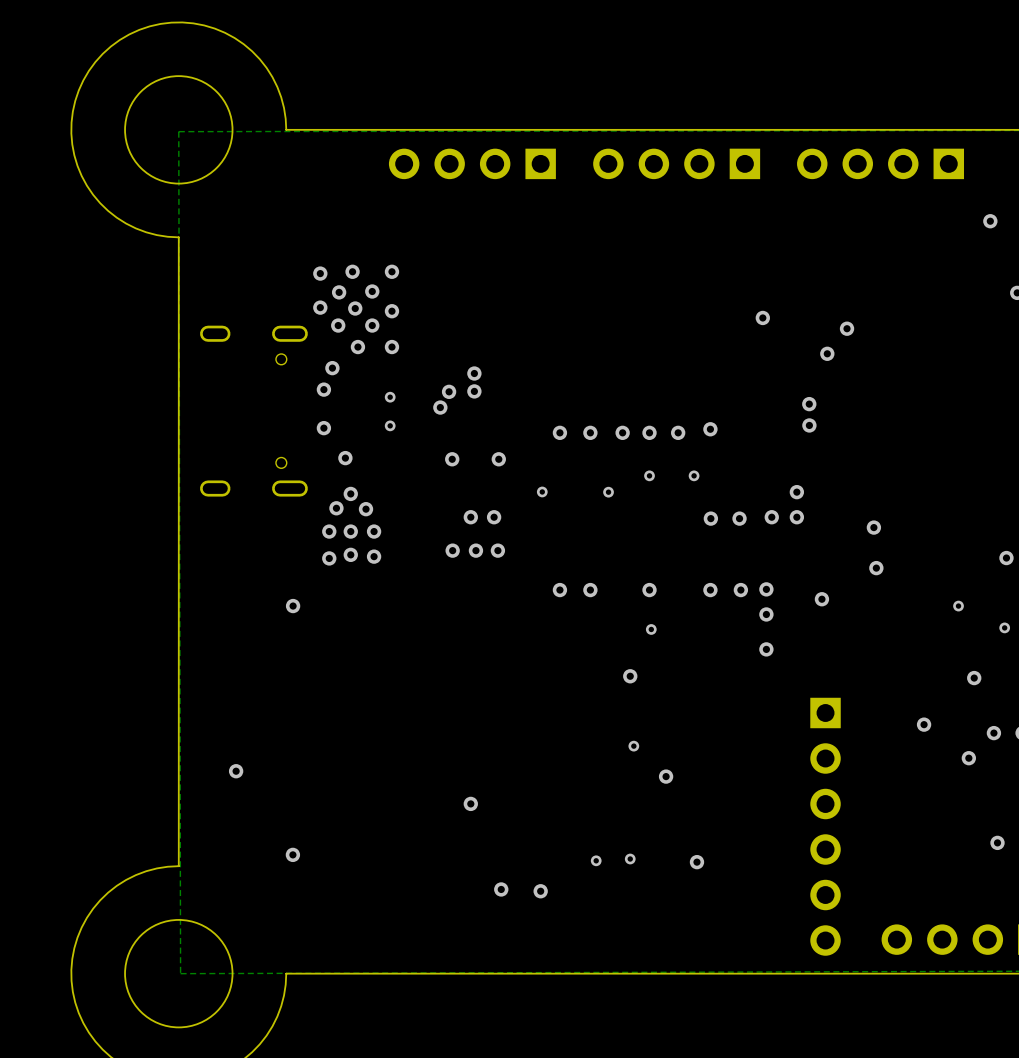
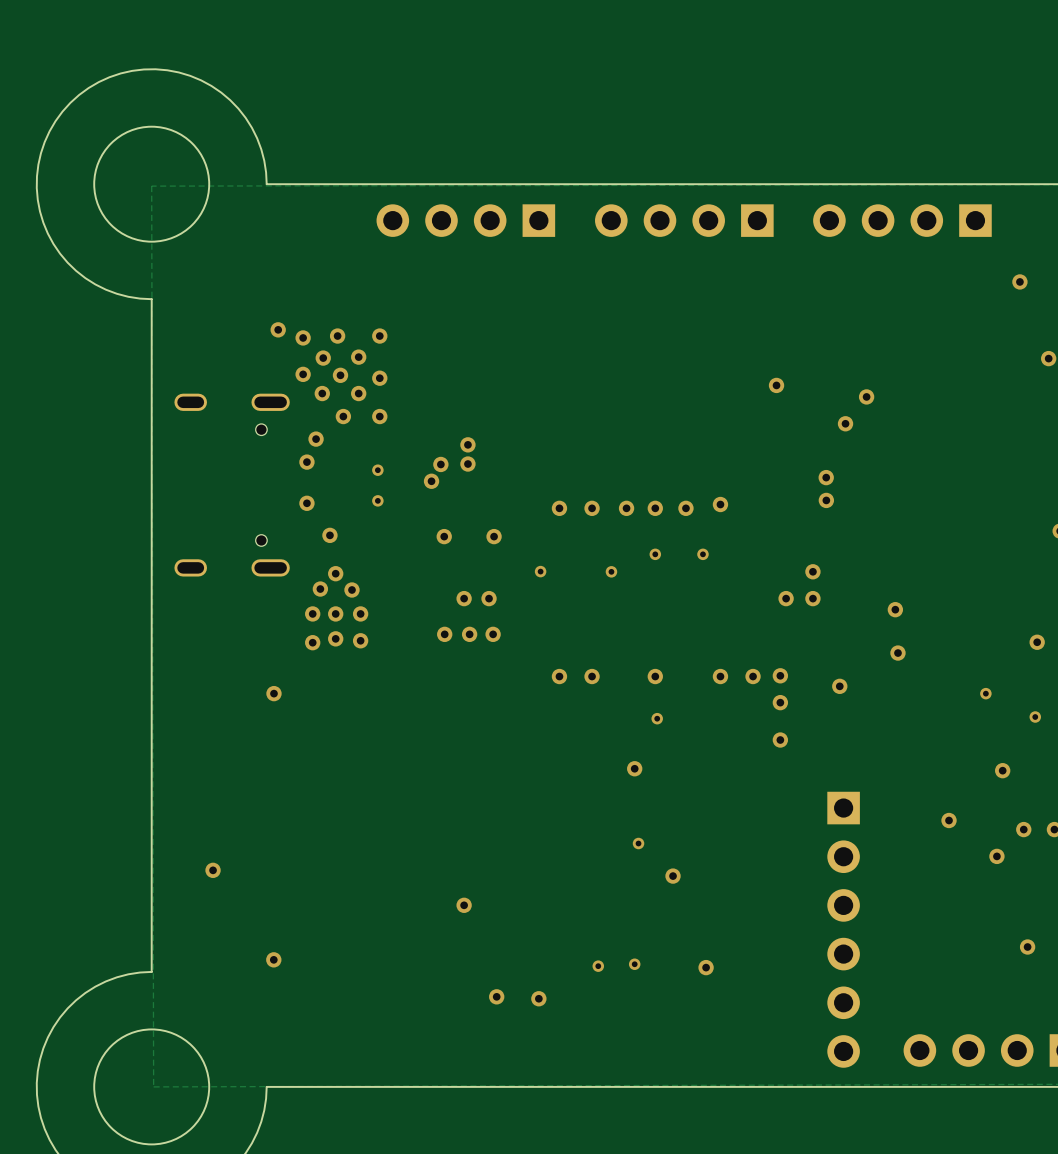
via: none -> (278, 329)
via: (710, 518) -> none
via: (739, 518) -> none

